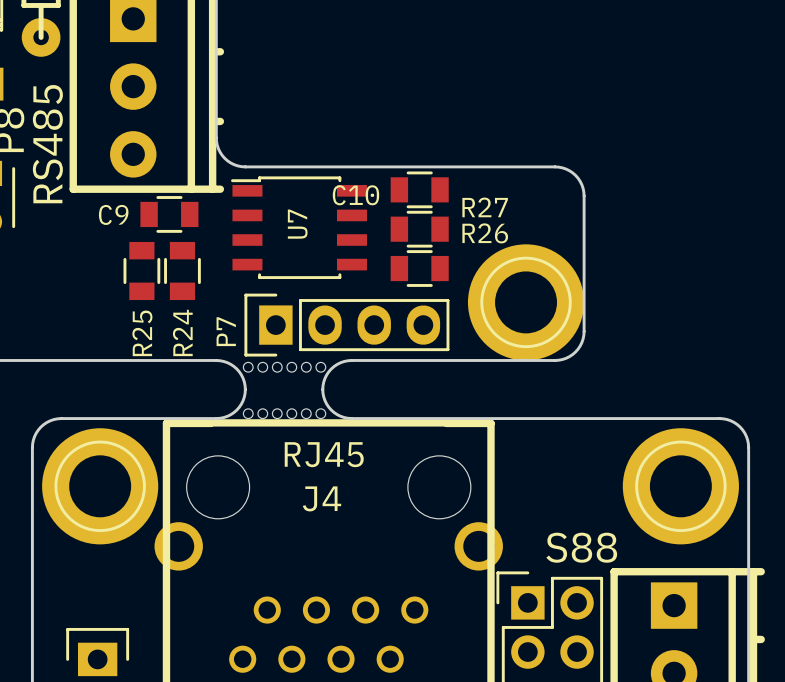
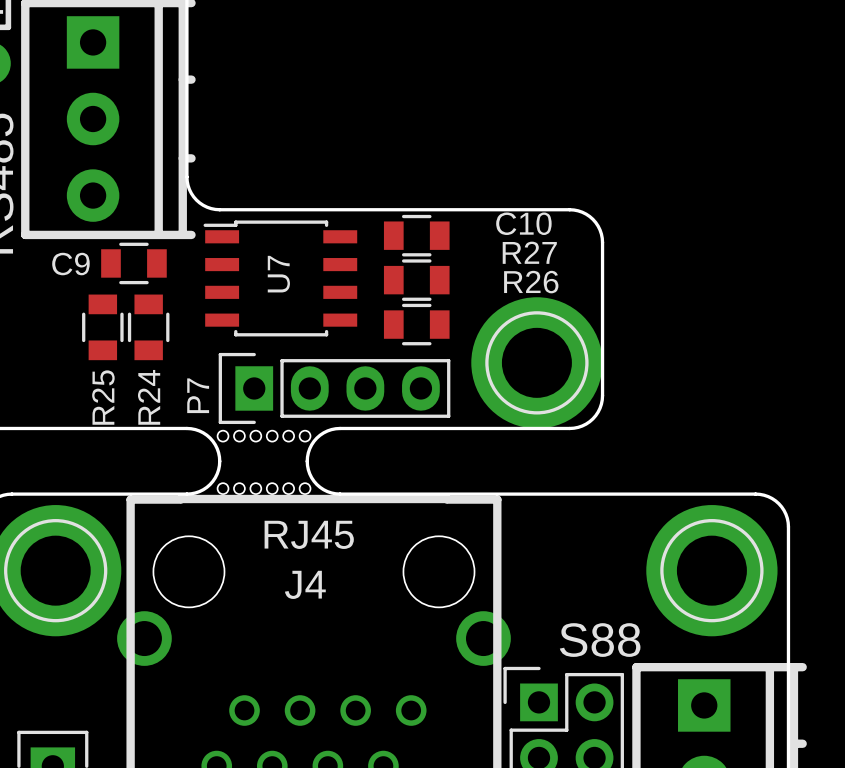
C10 name position: C10 (355, 195) -> C10 (523, 223)
R27 name position: R27 (485, 207) -> R27 (529, 252)
R26 name position: R26 (485, 233) -> R26 (531, 282)

